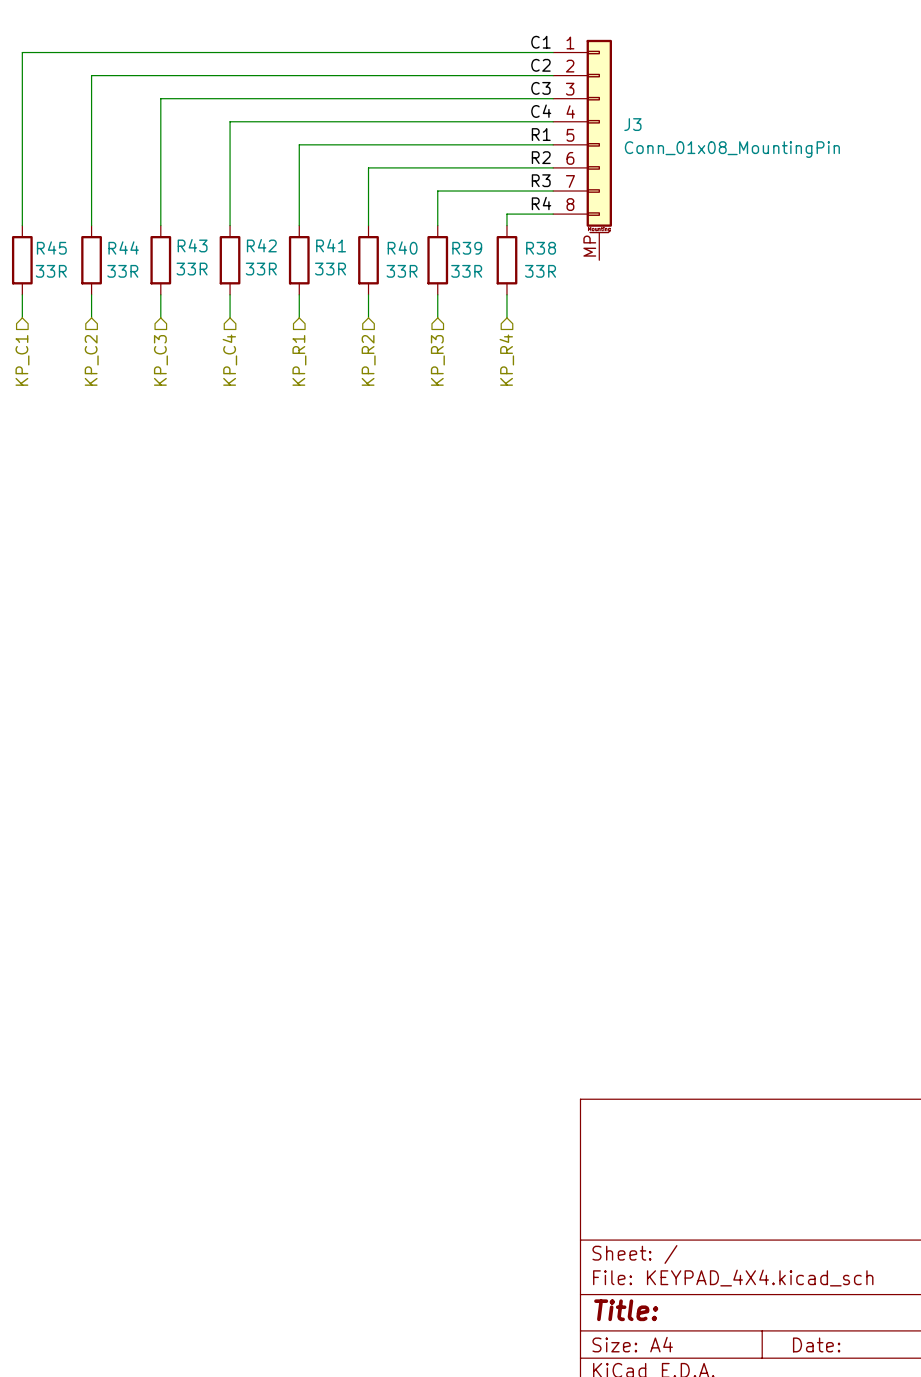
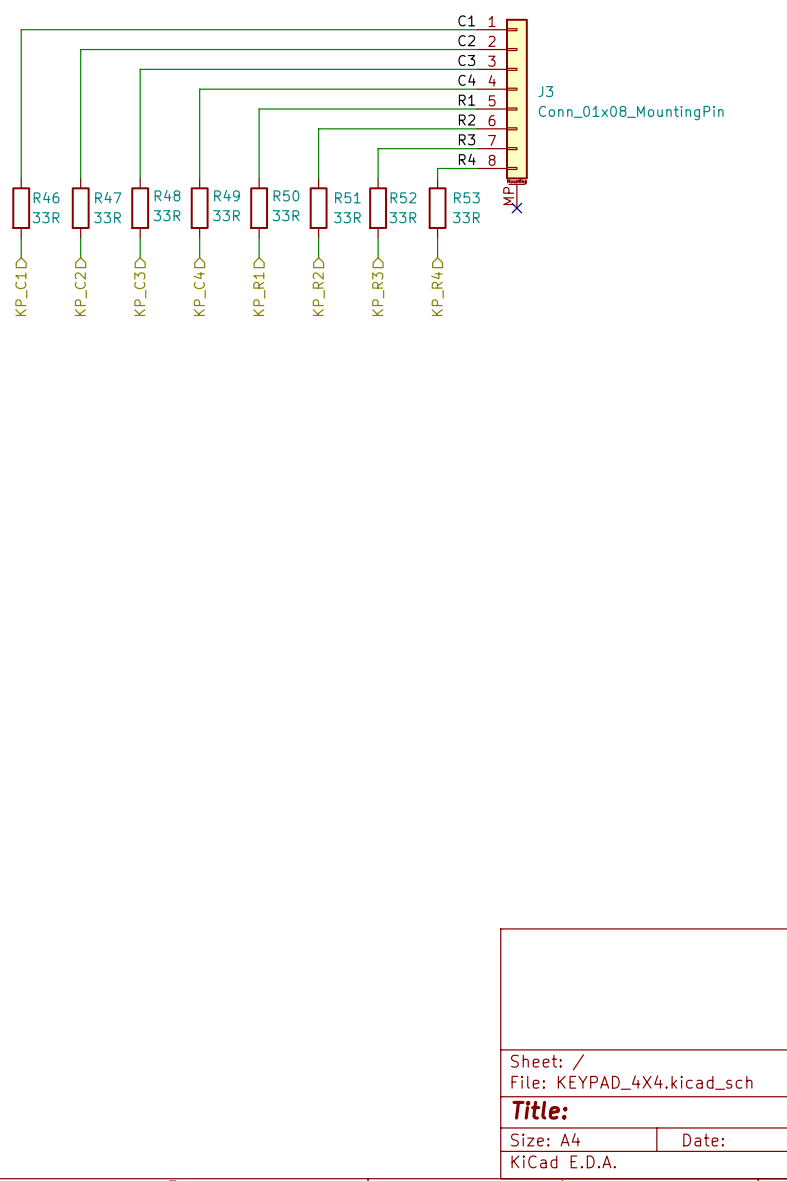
R43 name: R43 (192, 245) -> R48 (167, 195)
R42 name: R42 (261, 245) -> R49 (226, 195)
R41 name: R41 (331, 245) -> R50 (286, 195)
R45 name: R45 (51, 247) -> R46 (46, 197)
R44 name: R44 (123, 247) -> R47 (108, 197)
R40 name: R40 (402, 247) -> R51 (347, 197)
R39 name: R39 (467, 248) -> R52 (403, 197)
R38 name: R38 (541, 248) -> R53 (466, 197)
no-connect mark: none -> (516, 208)

